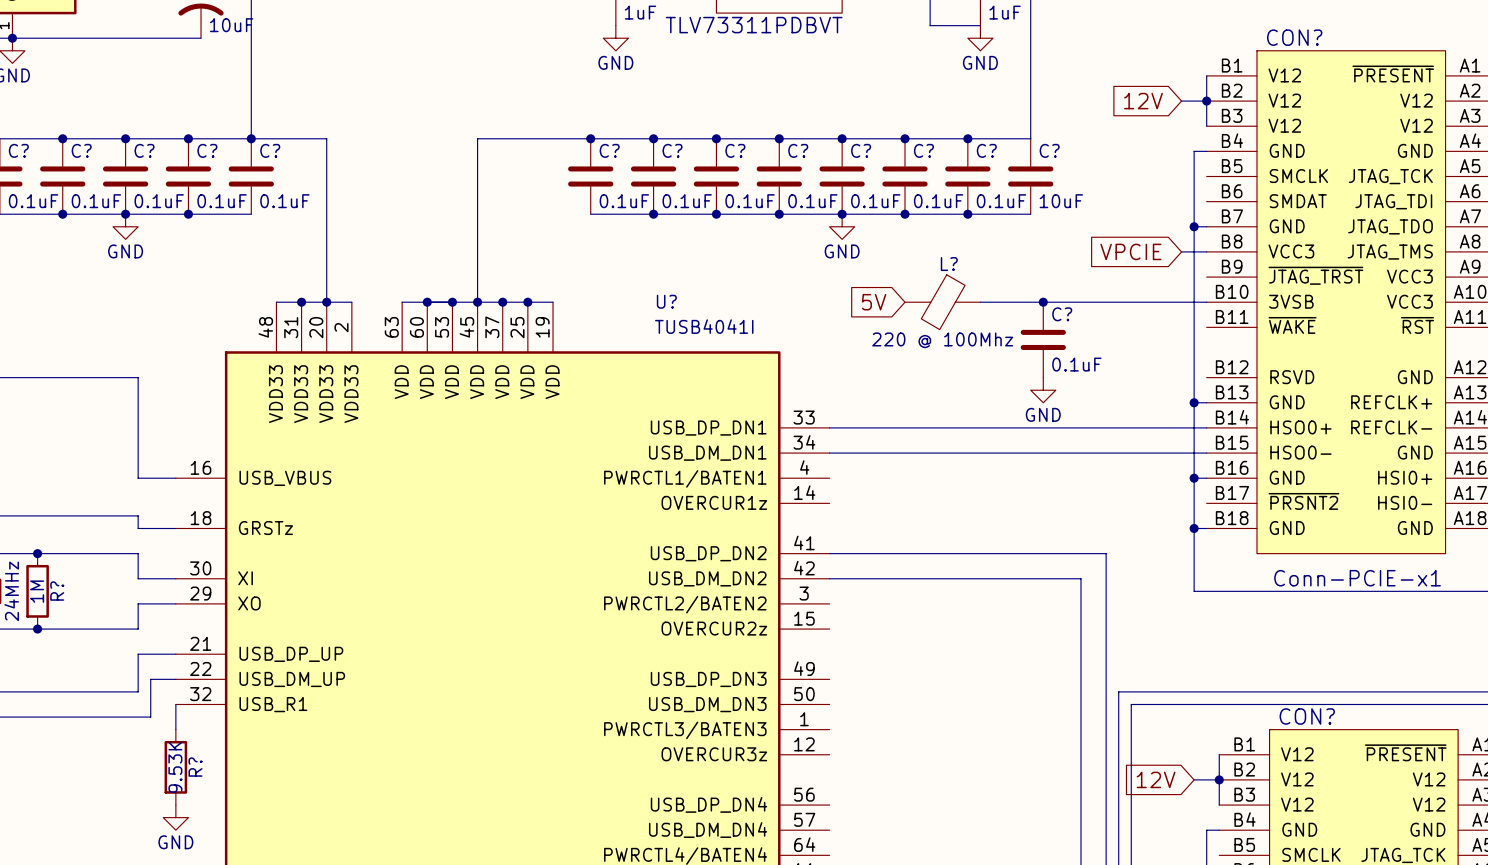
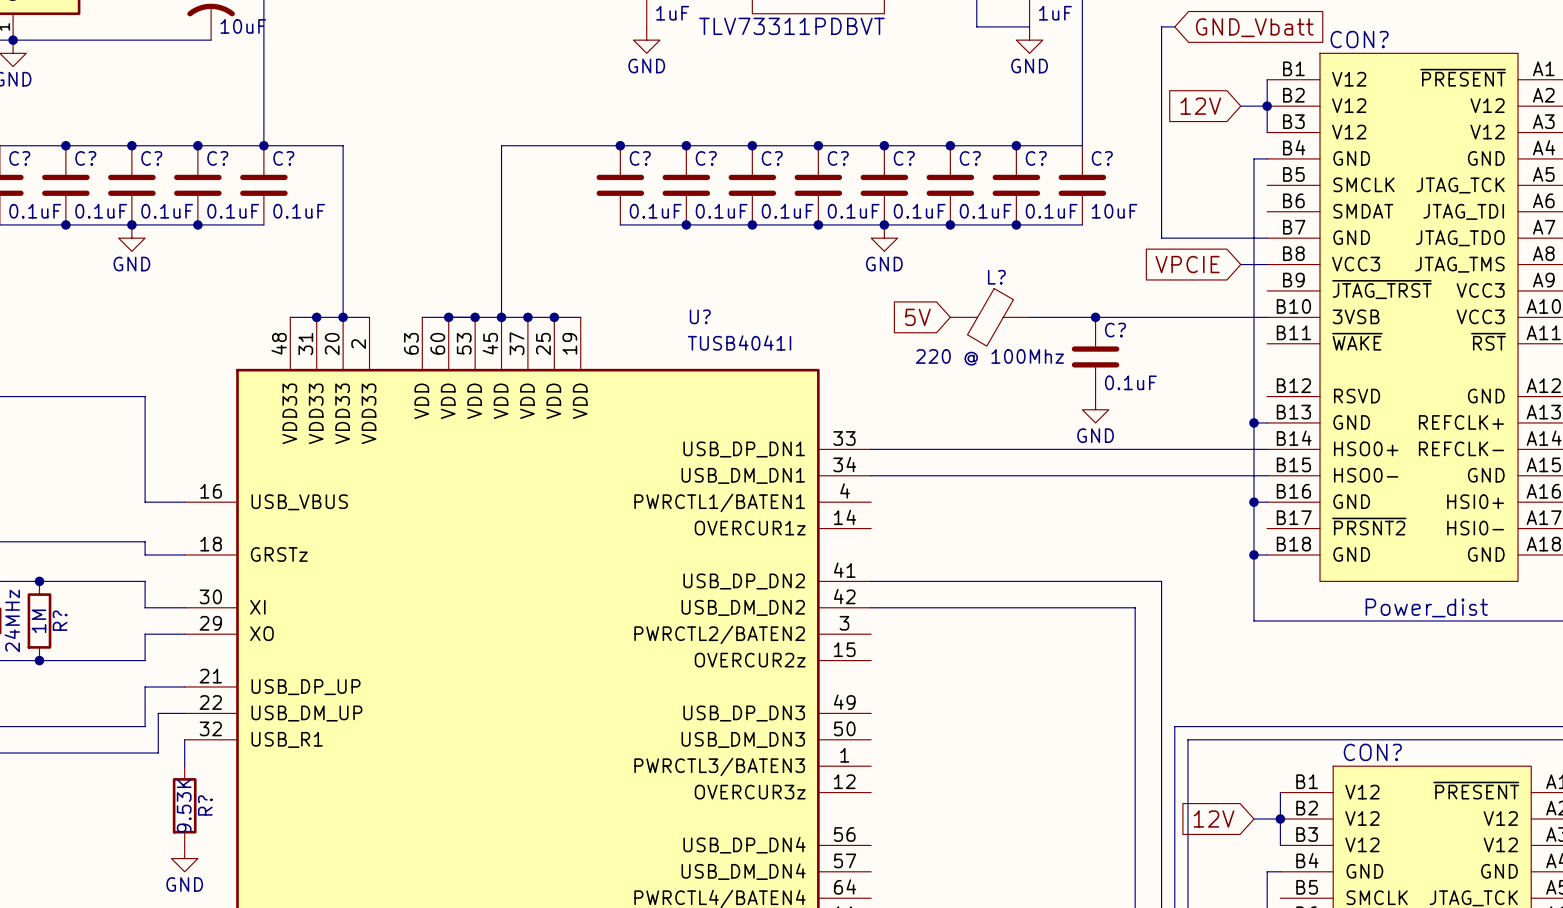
wire: none -> (1174, 26) (1161, 26) (1161, 238) (1253, 238)
global label: none -> GND_Vbatt (1254, 27)
junction: (1194, 226) -> none
CON? value: Conn-PCIE-x1 (1357, 578) -> Power_dist (1426, 607)

